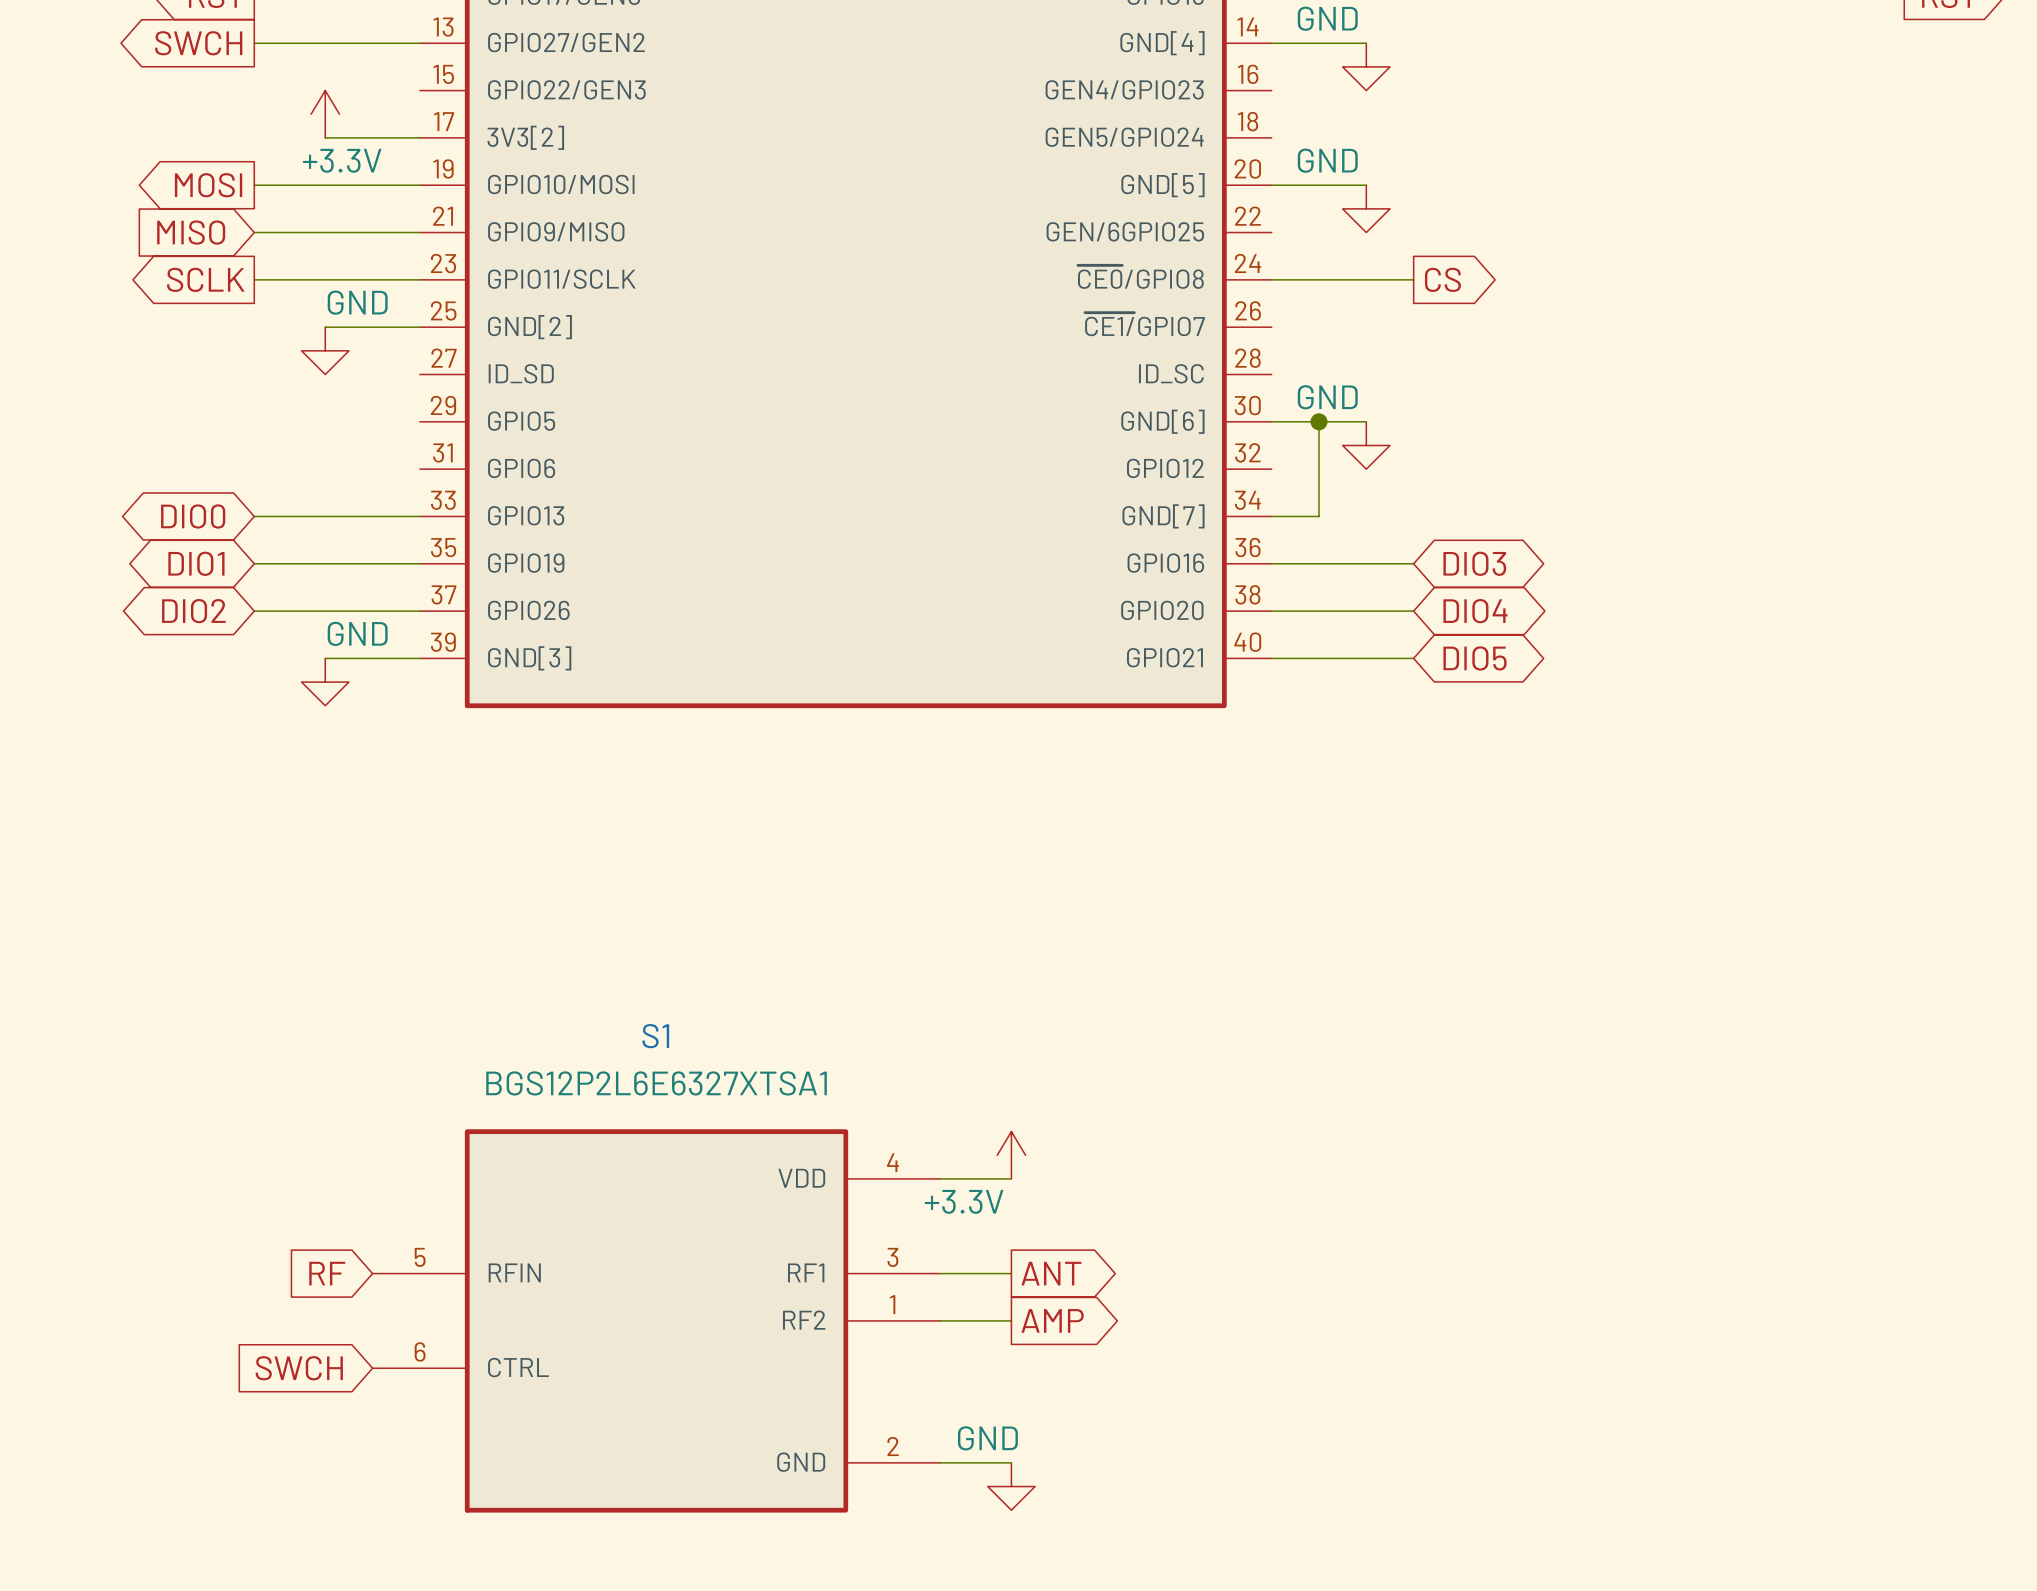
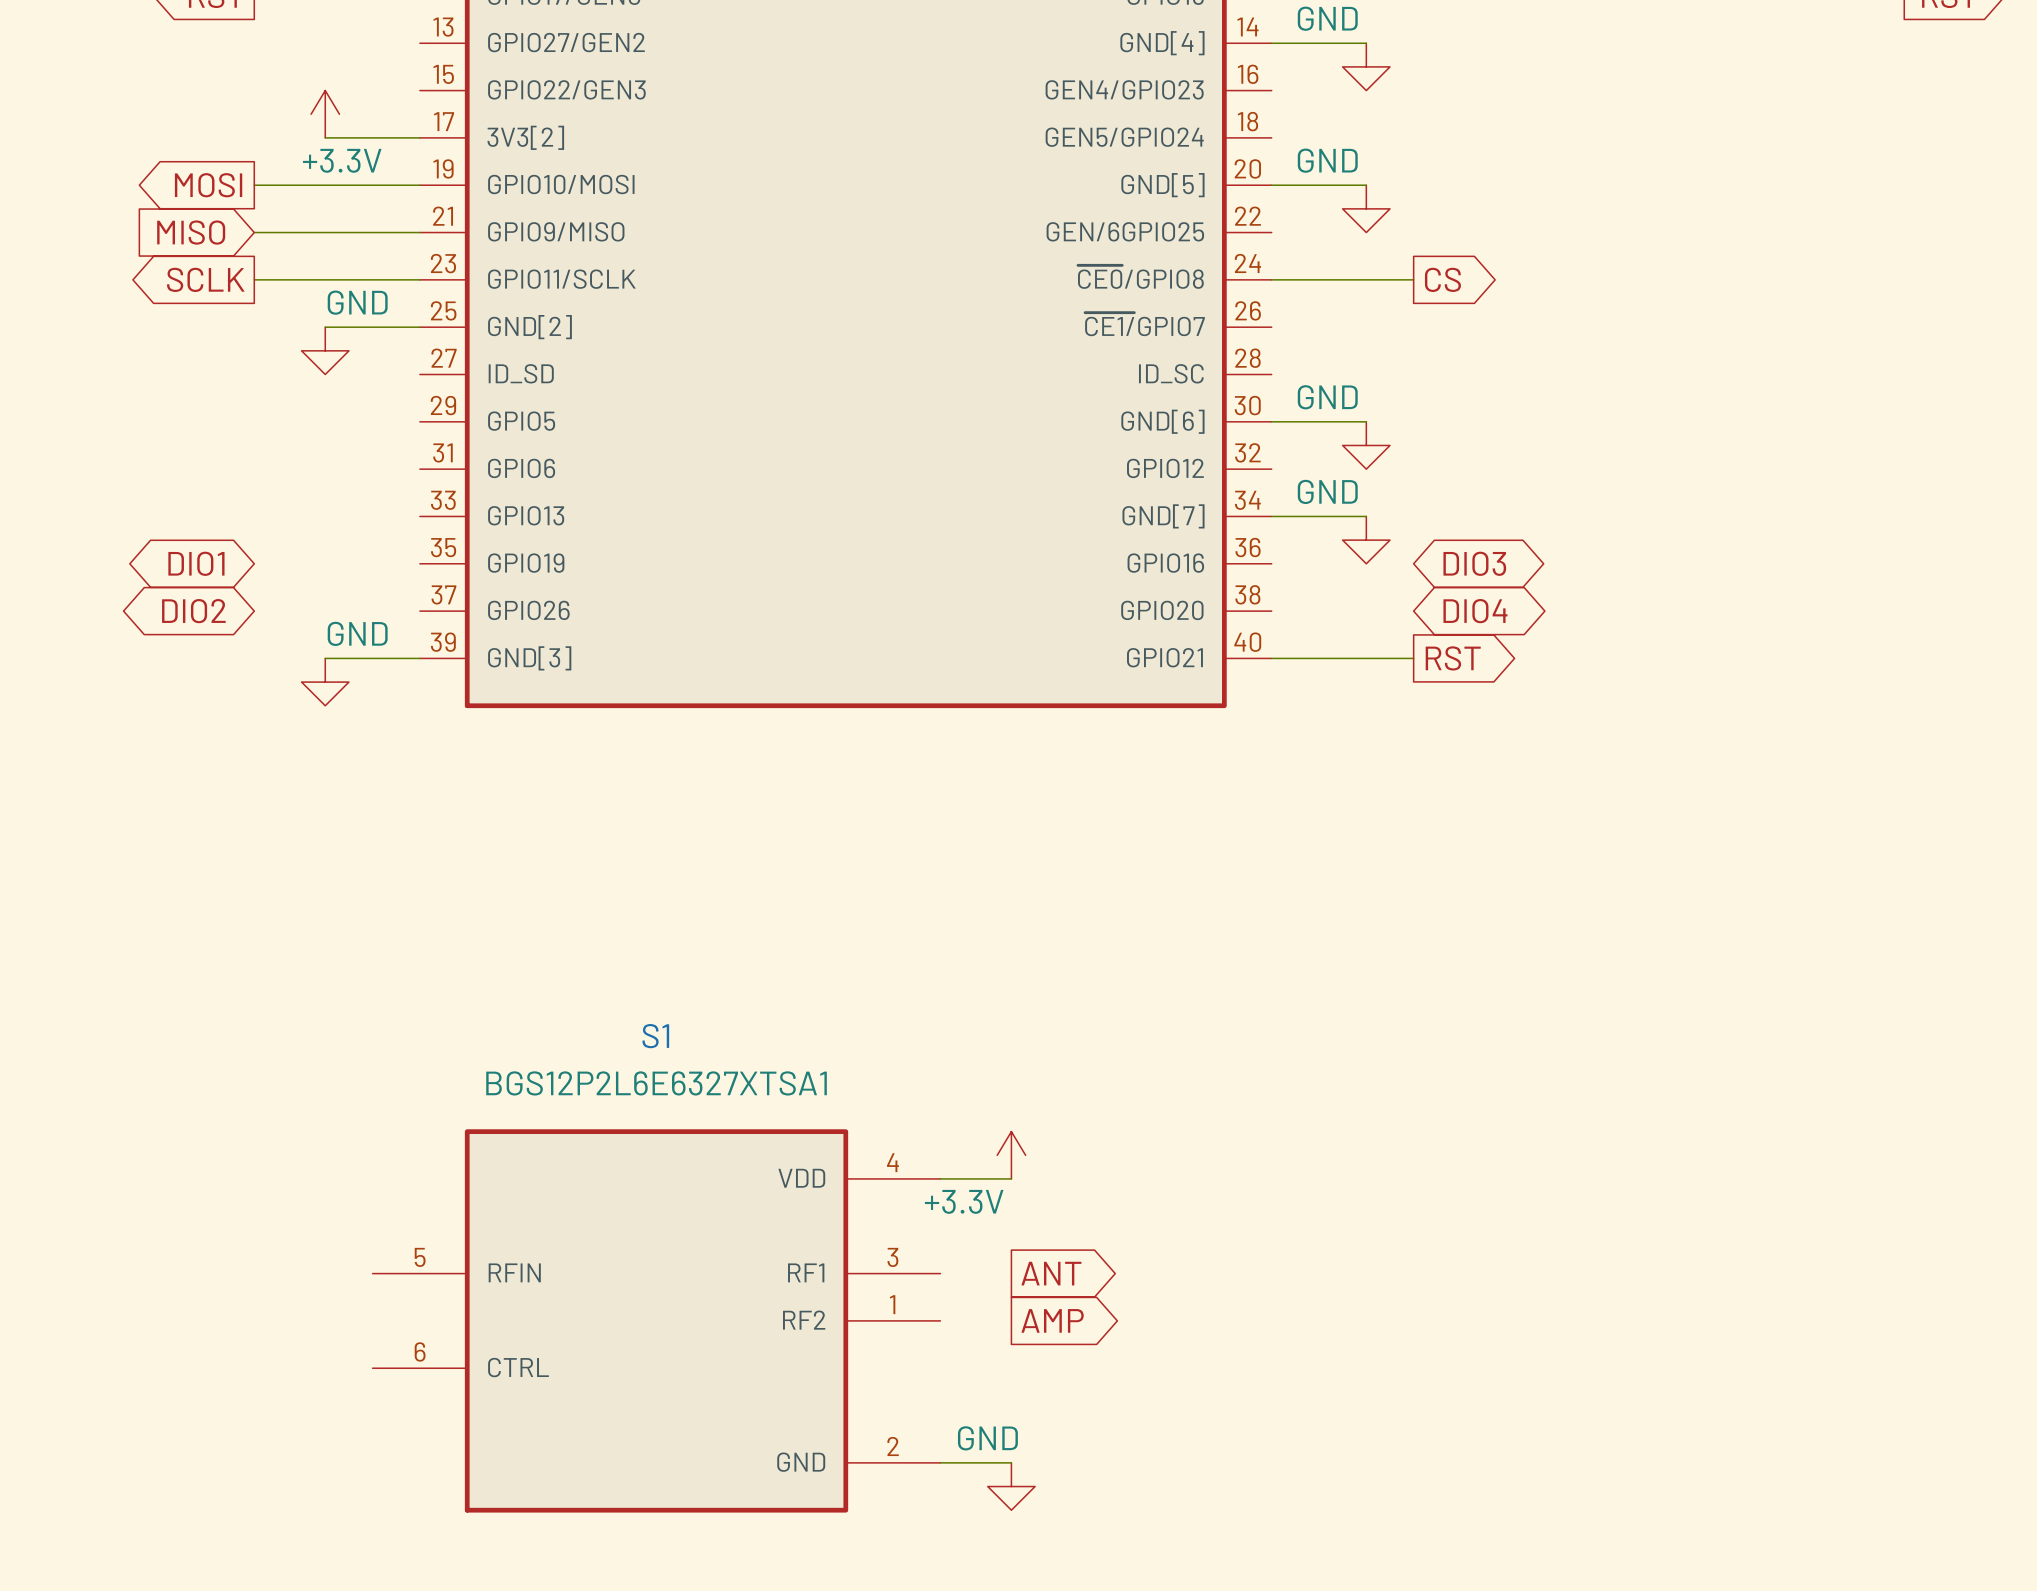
global label: SWCH (198, 43) -> none
wire: (254, 43) (419, 43) -> none
wire: (1319, 421) (1319, 516) -> (1366, 516) (1319, 516)
junction: (1319, 421) -> none
global label: DIO0 (193, 516) -> none
wire: (254, 516) (419, 516) -> none
power symbol: none -> GND (1366, 540)
wire: (254, 563) (419, 563) -> none
wire: (1271, 563) (1413, 563) -> none
wire: (254, 611) (419, 611) -> none
wire: (1271, 611) (1413, 611) -> none
global label shape: bidirectional (1475, 658) -> output (1453, 658)
global label: DIO5 (1475, 658) -> RST (1453, 658)
global label: RF (327, 1273) -> none
wire: (940, 1273) (1011, 1273) -> none
wire: (940, 1320) (1011, 1320) -> none
global label: SWCH (299, 1368) -> none

